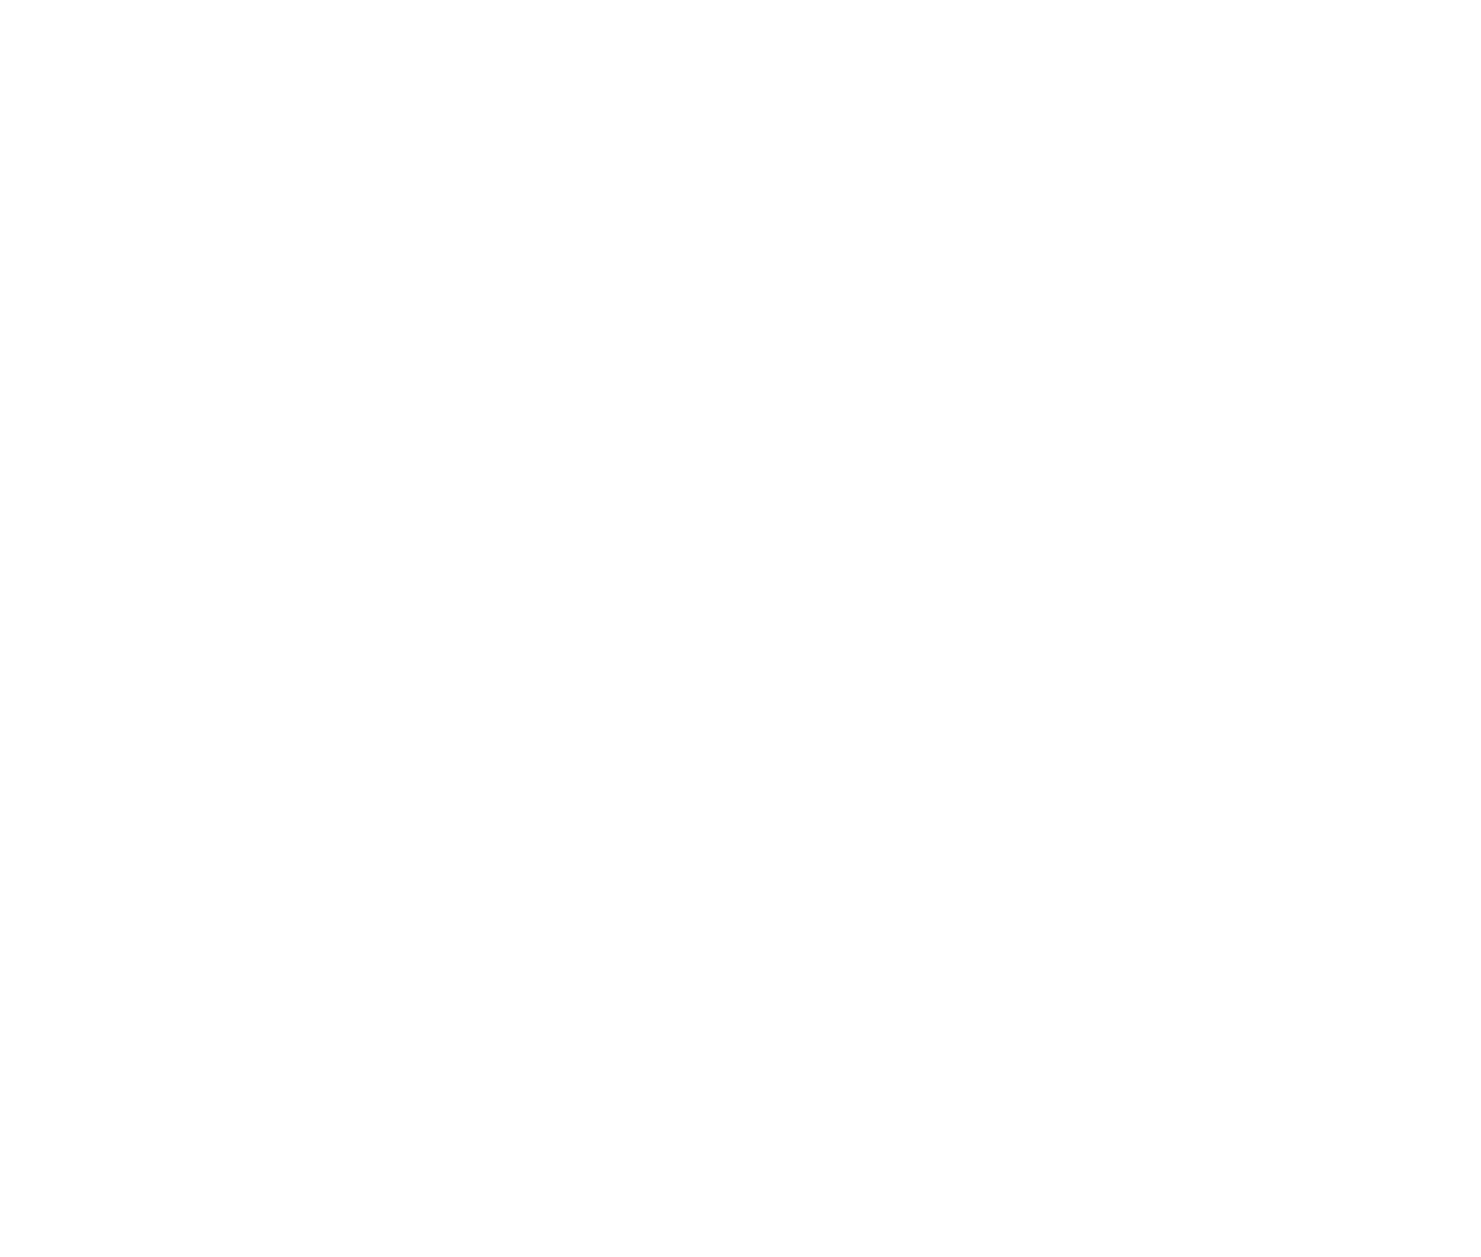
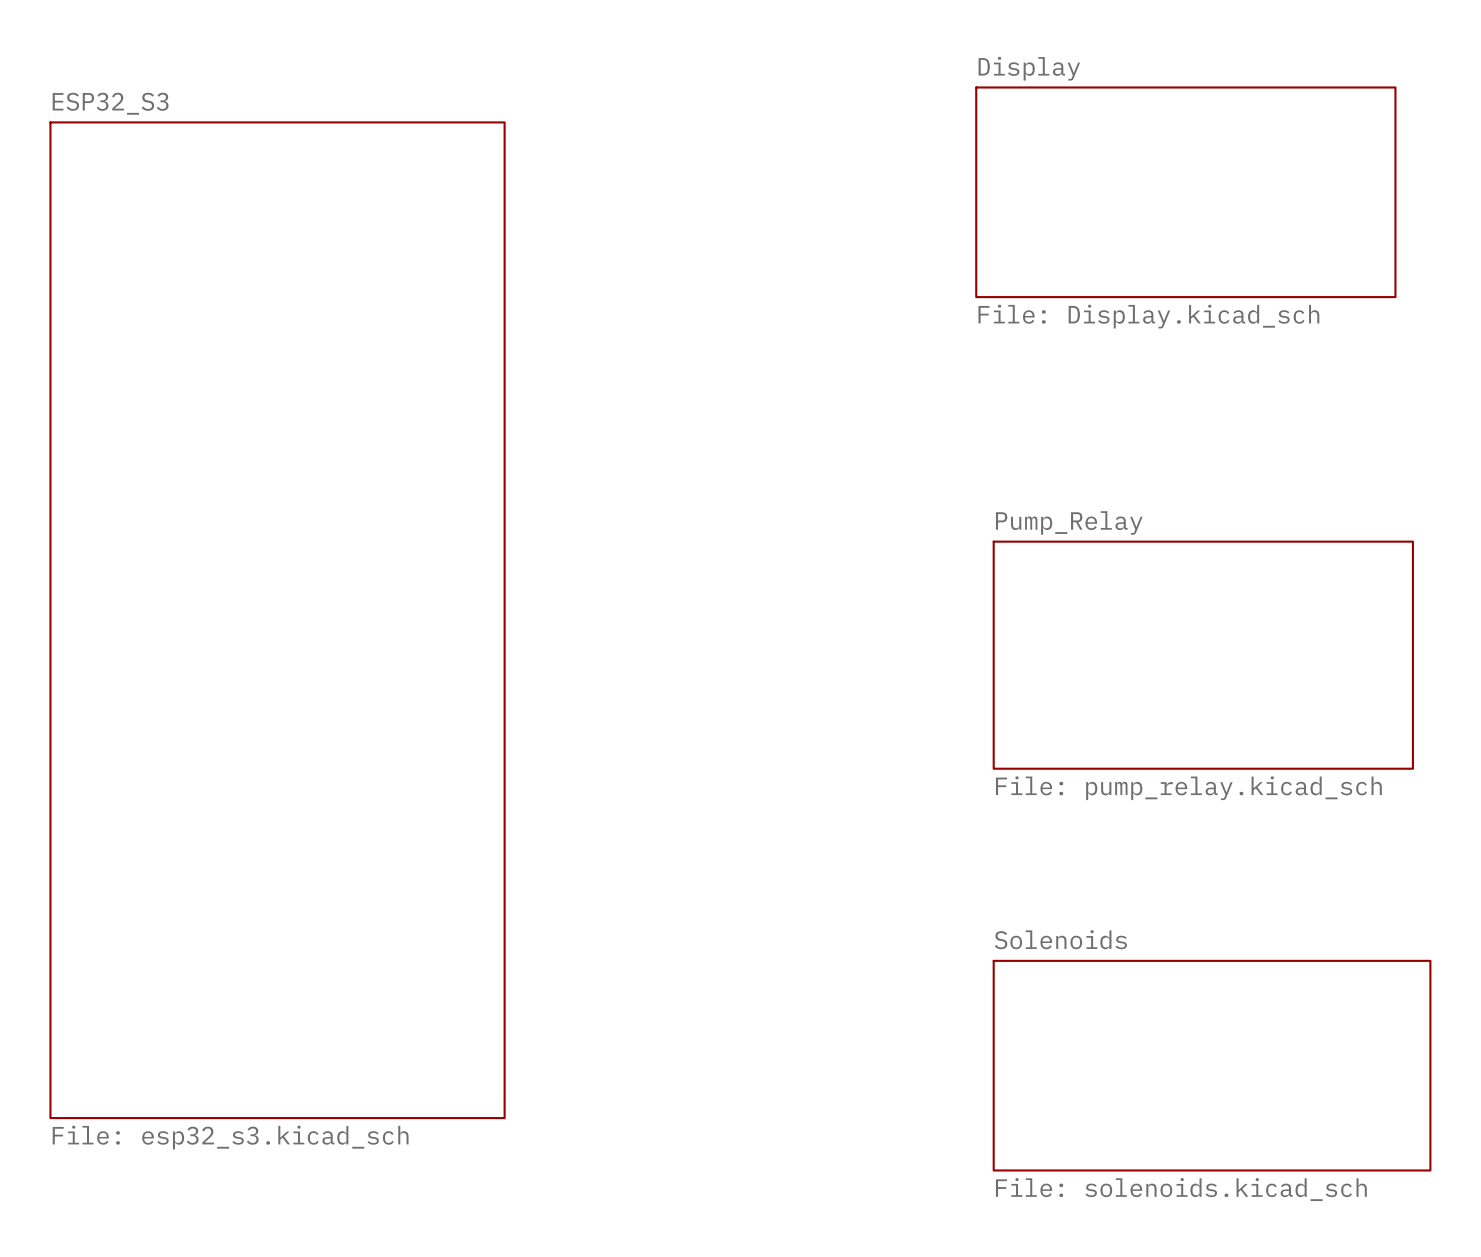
sheet Display: none -> File: Display.kicad_sch (1185, 192)
sheet ESP32_S3: none -> File: esp32_s3.kicad_sch (277, 620)
sheet Pump_Relay: none -> File: pump_relay.kicad_sch (1203, 655)
sheet Solenoids: none -> File: solenoids.kicad_sch (1212, 1065)

